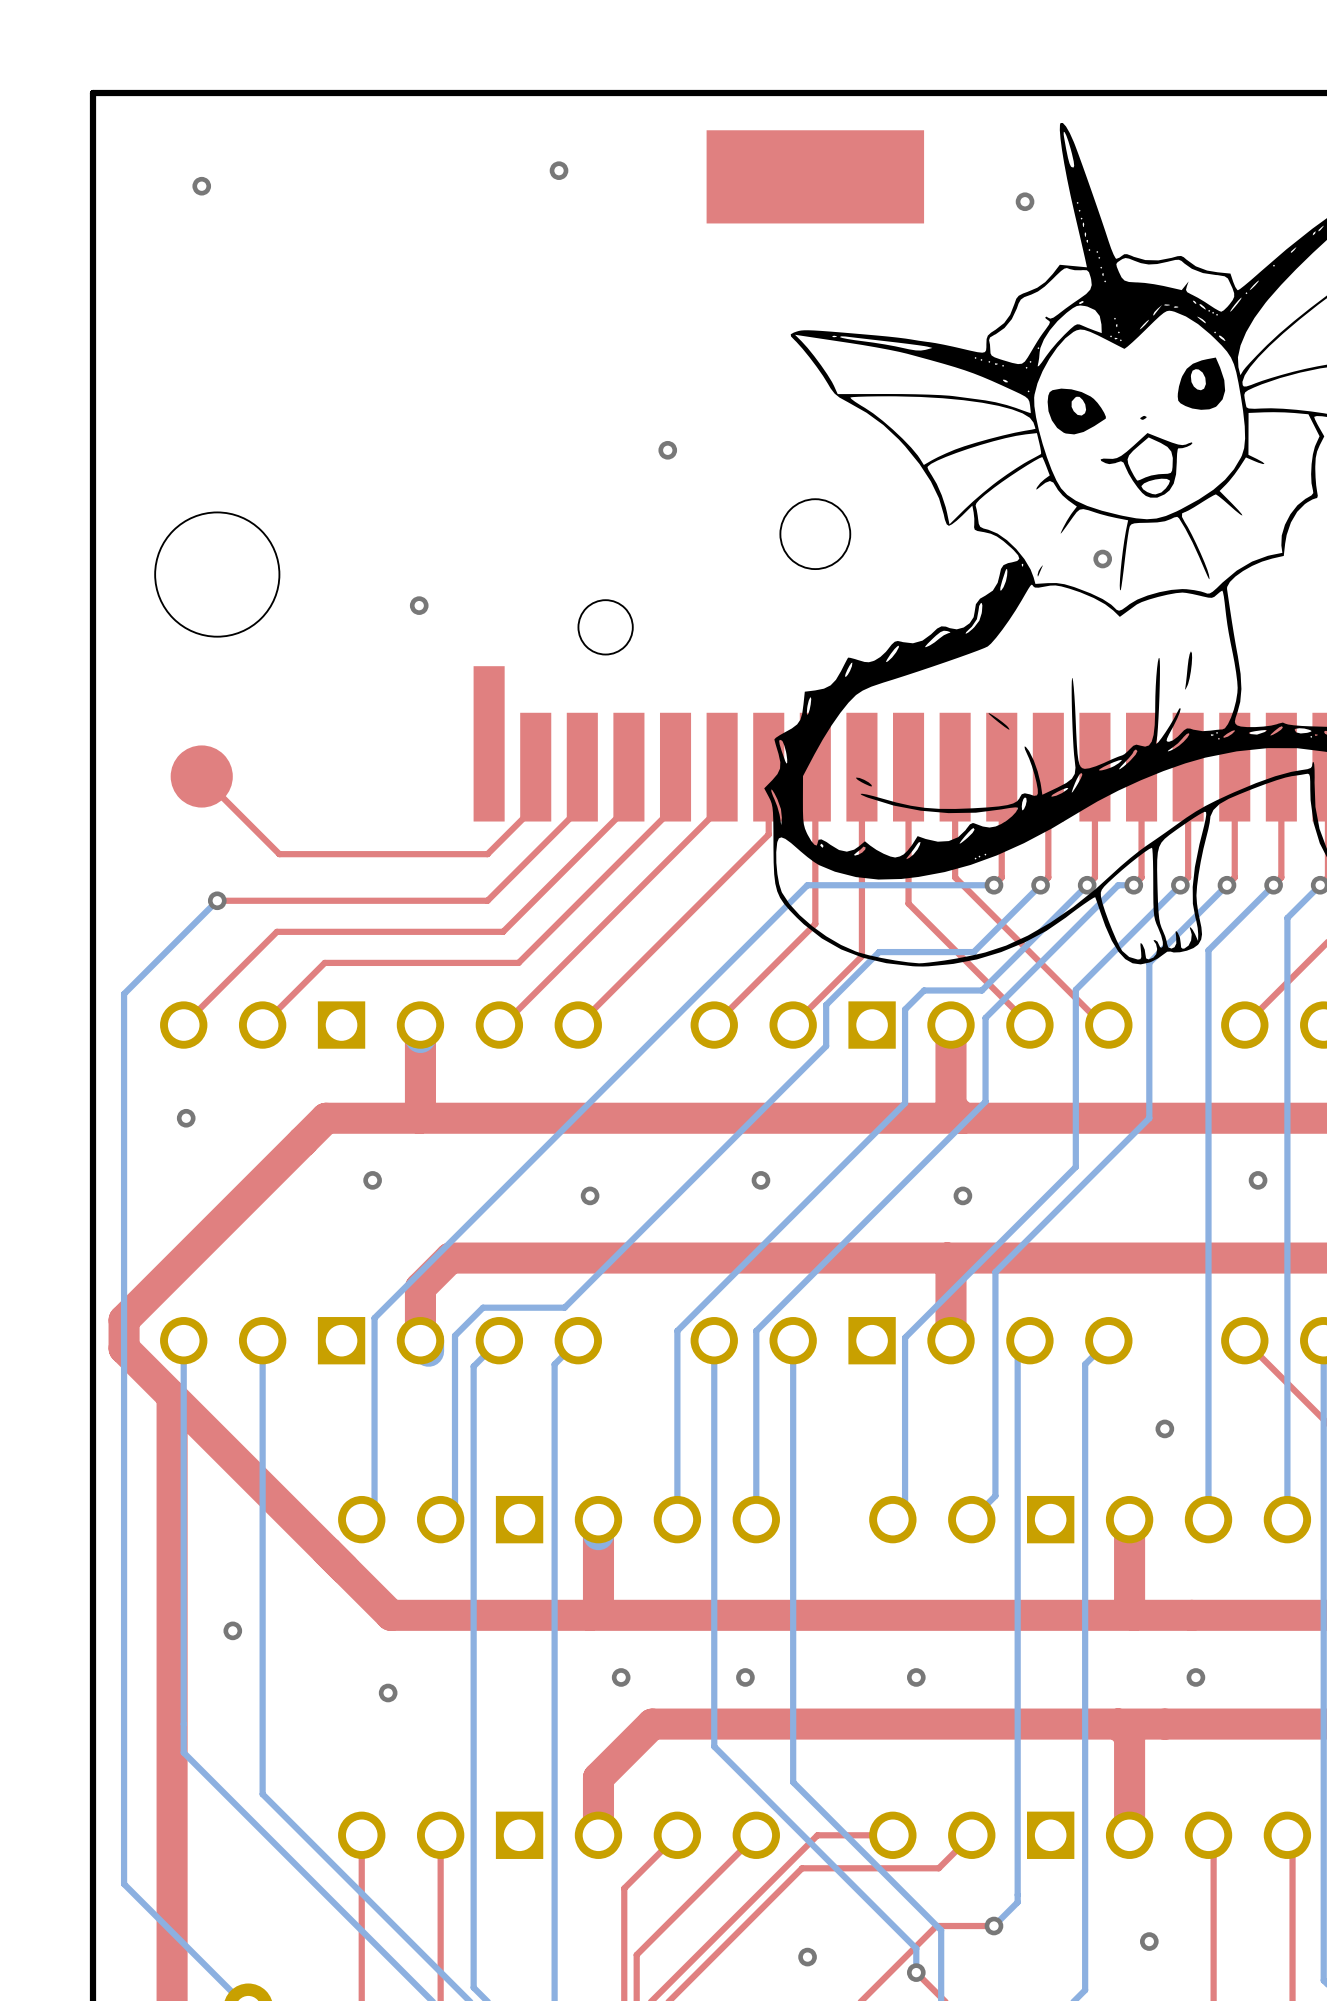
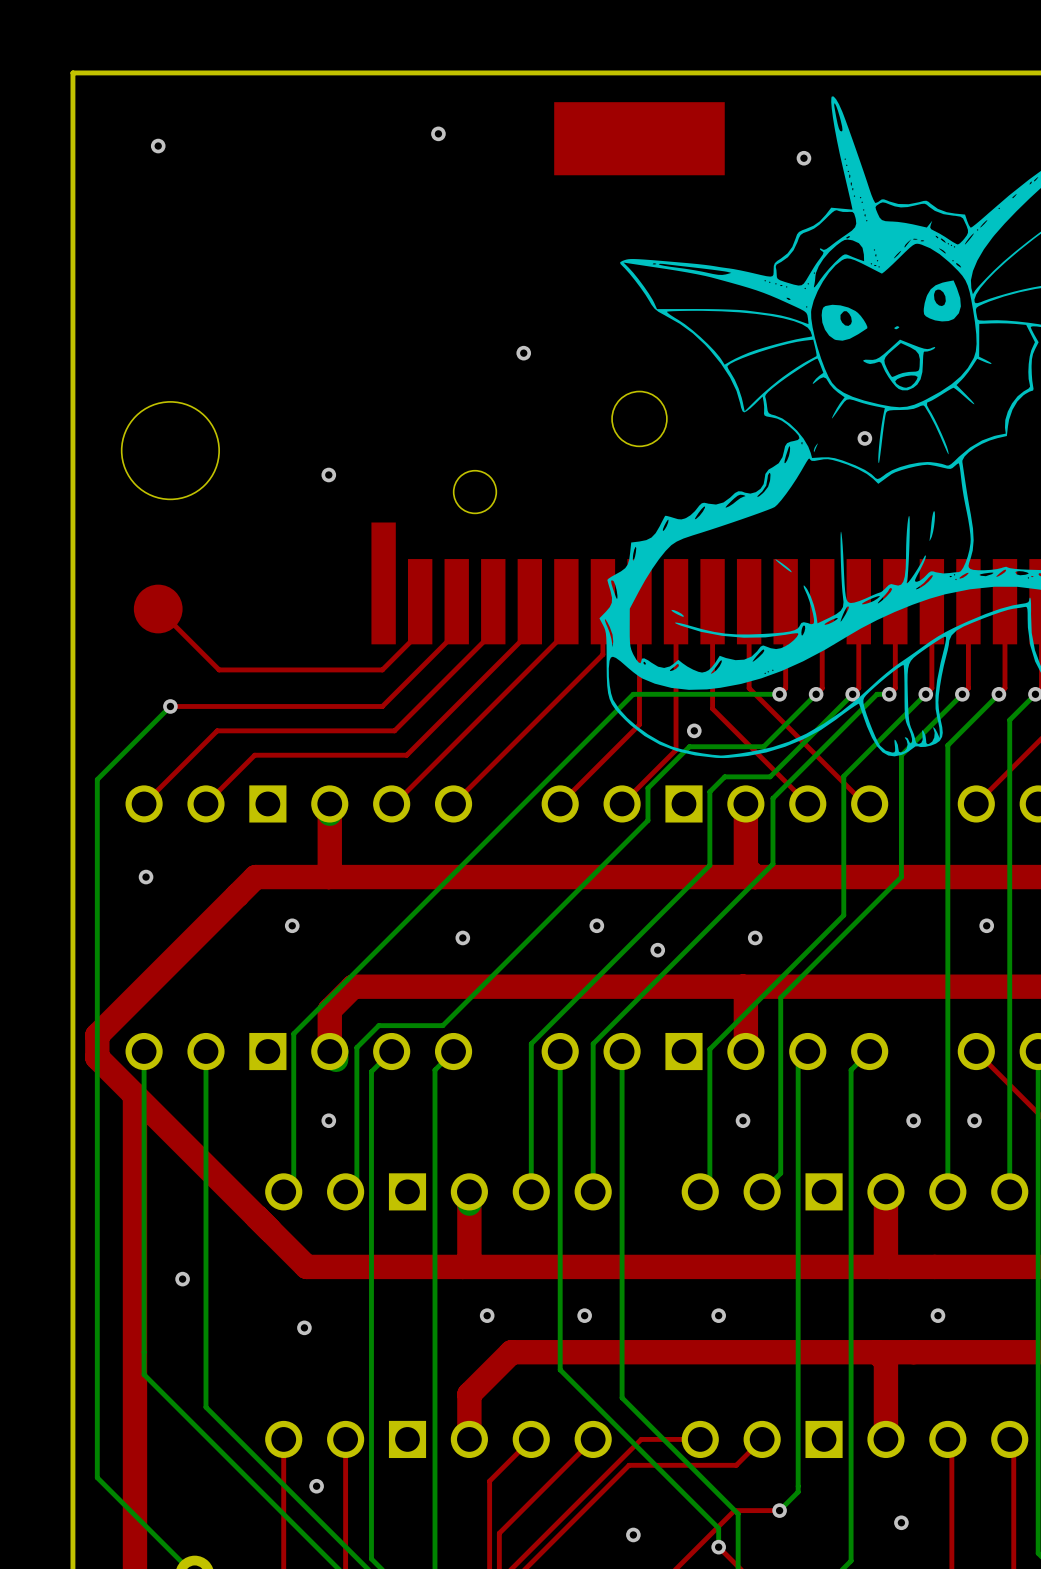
via: none -> (694, 730)
via: none -> (657, 950)
via: none -> (328, 1120)
via: none -> (743, 1120)
via: none -> (974, 1120)
via: none -> (316, 1486)

